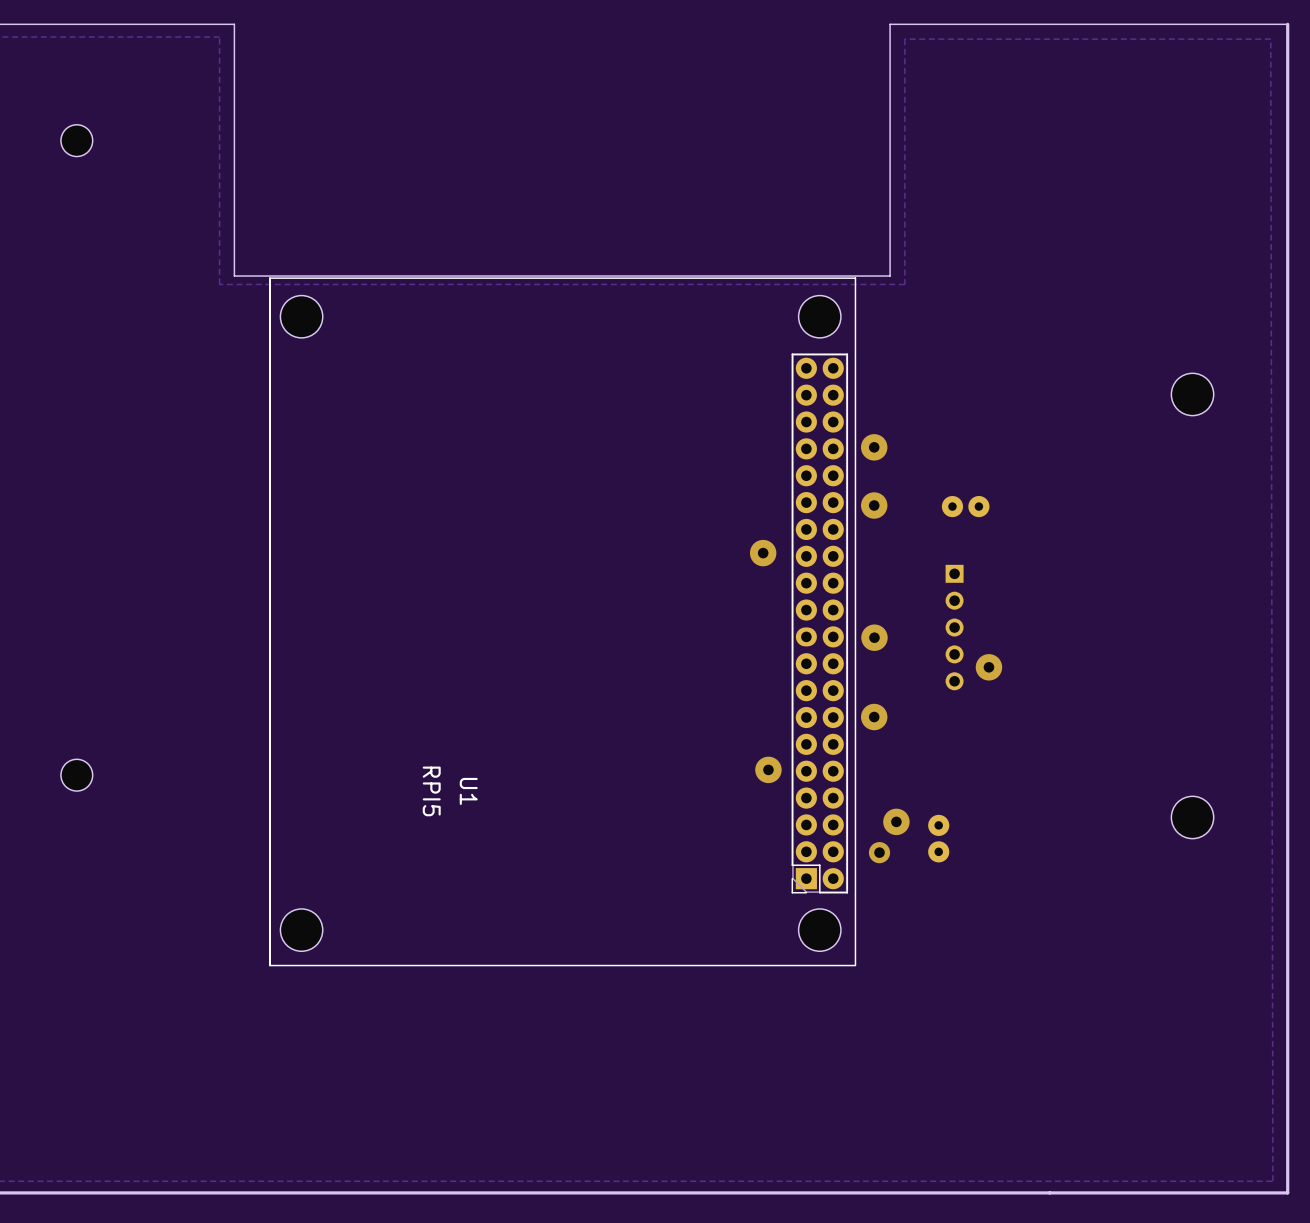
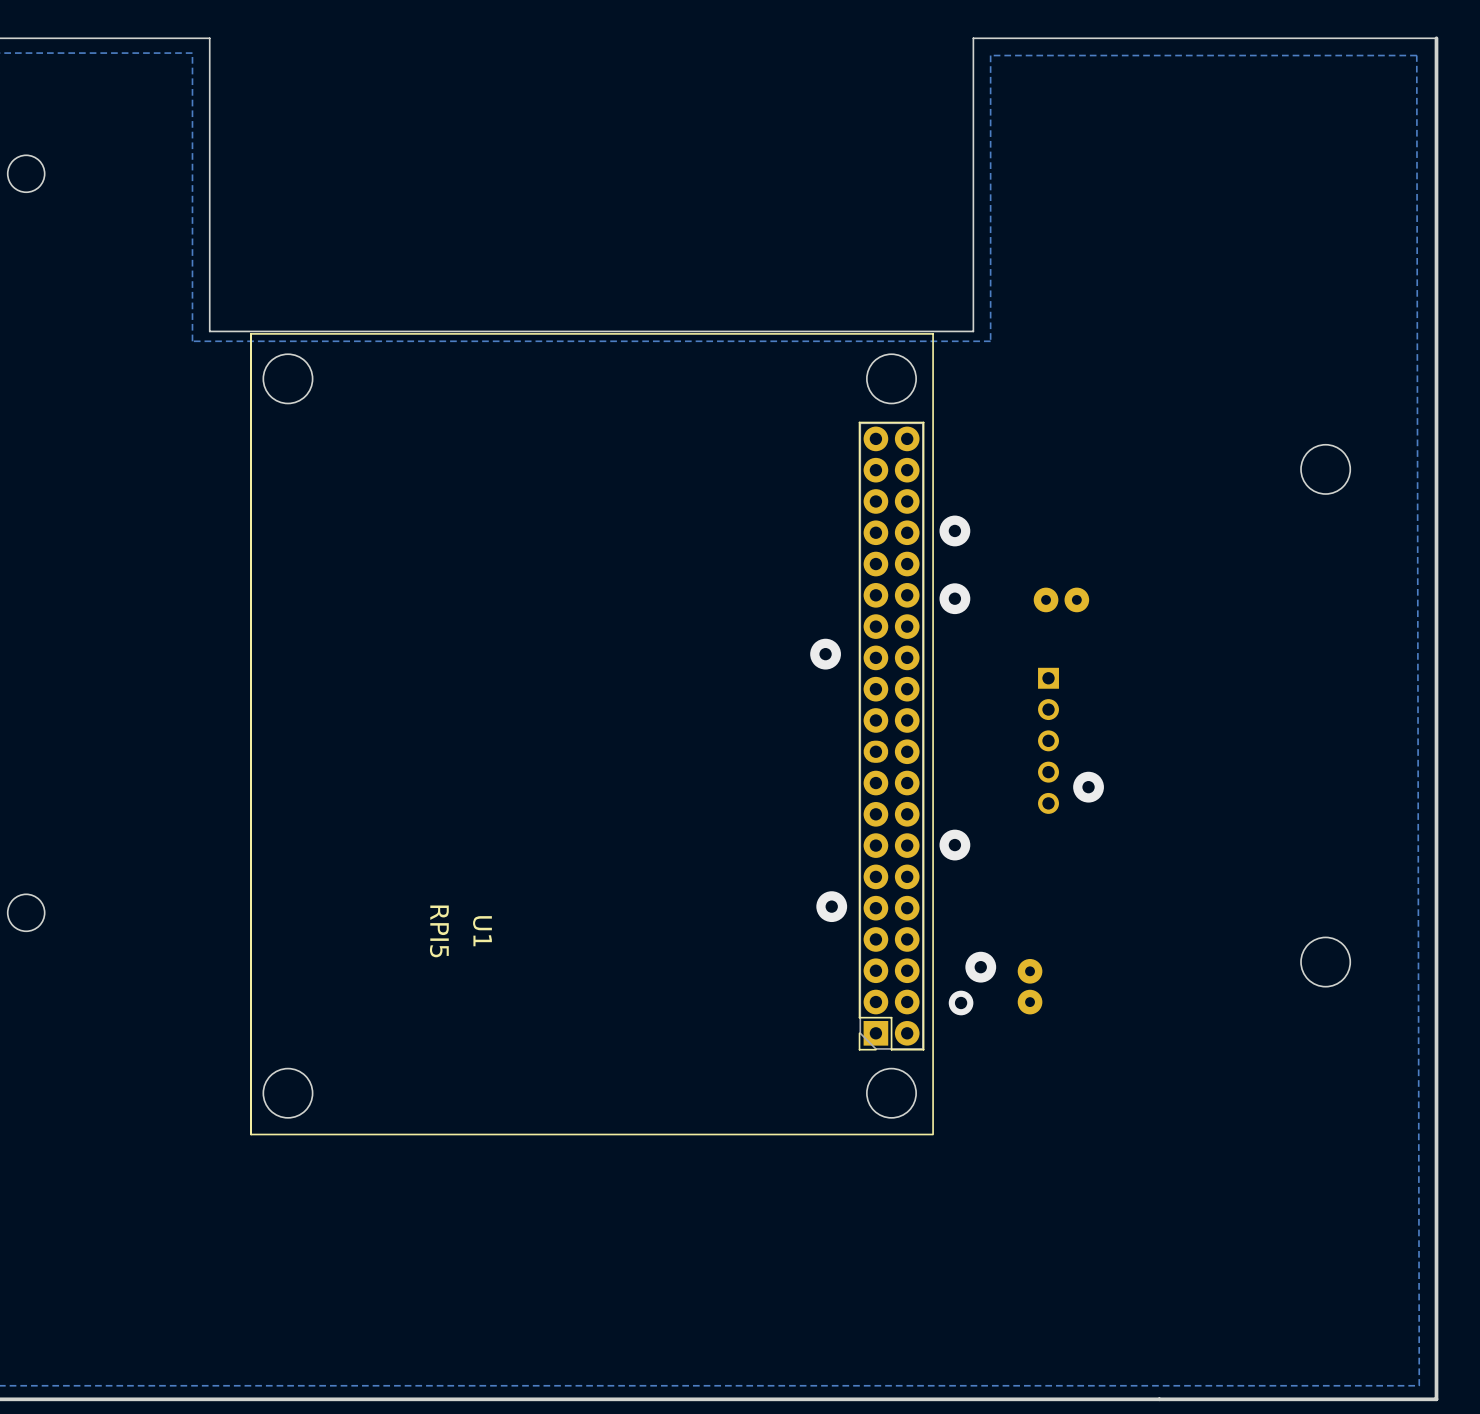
via: (874, 637) -> none

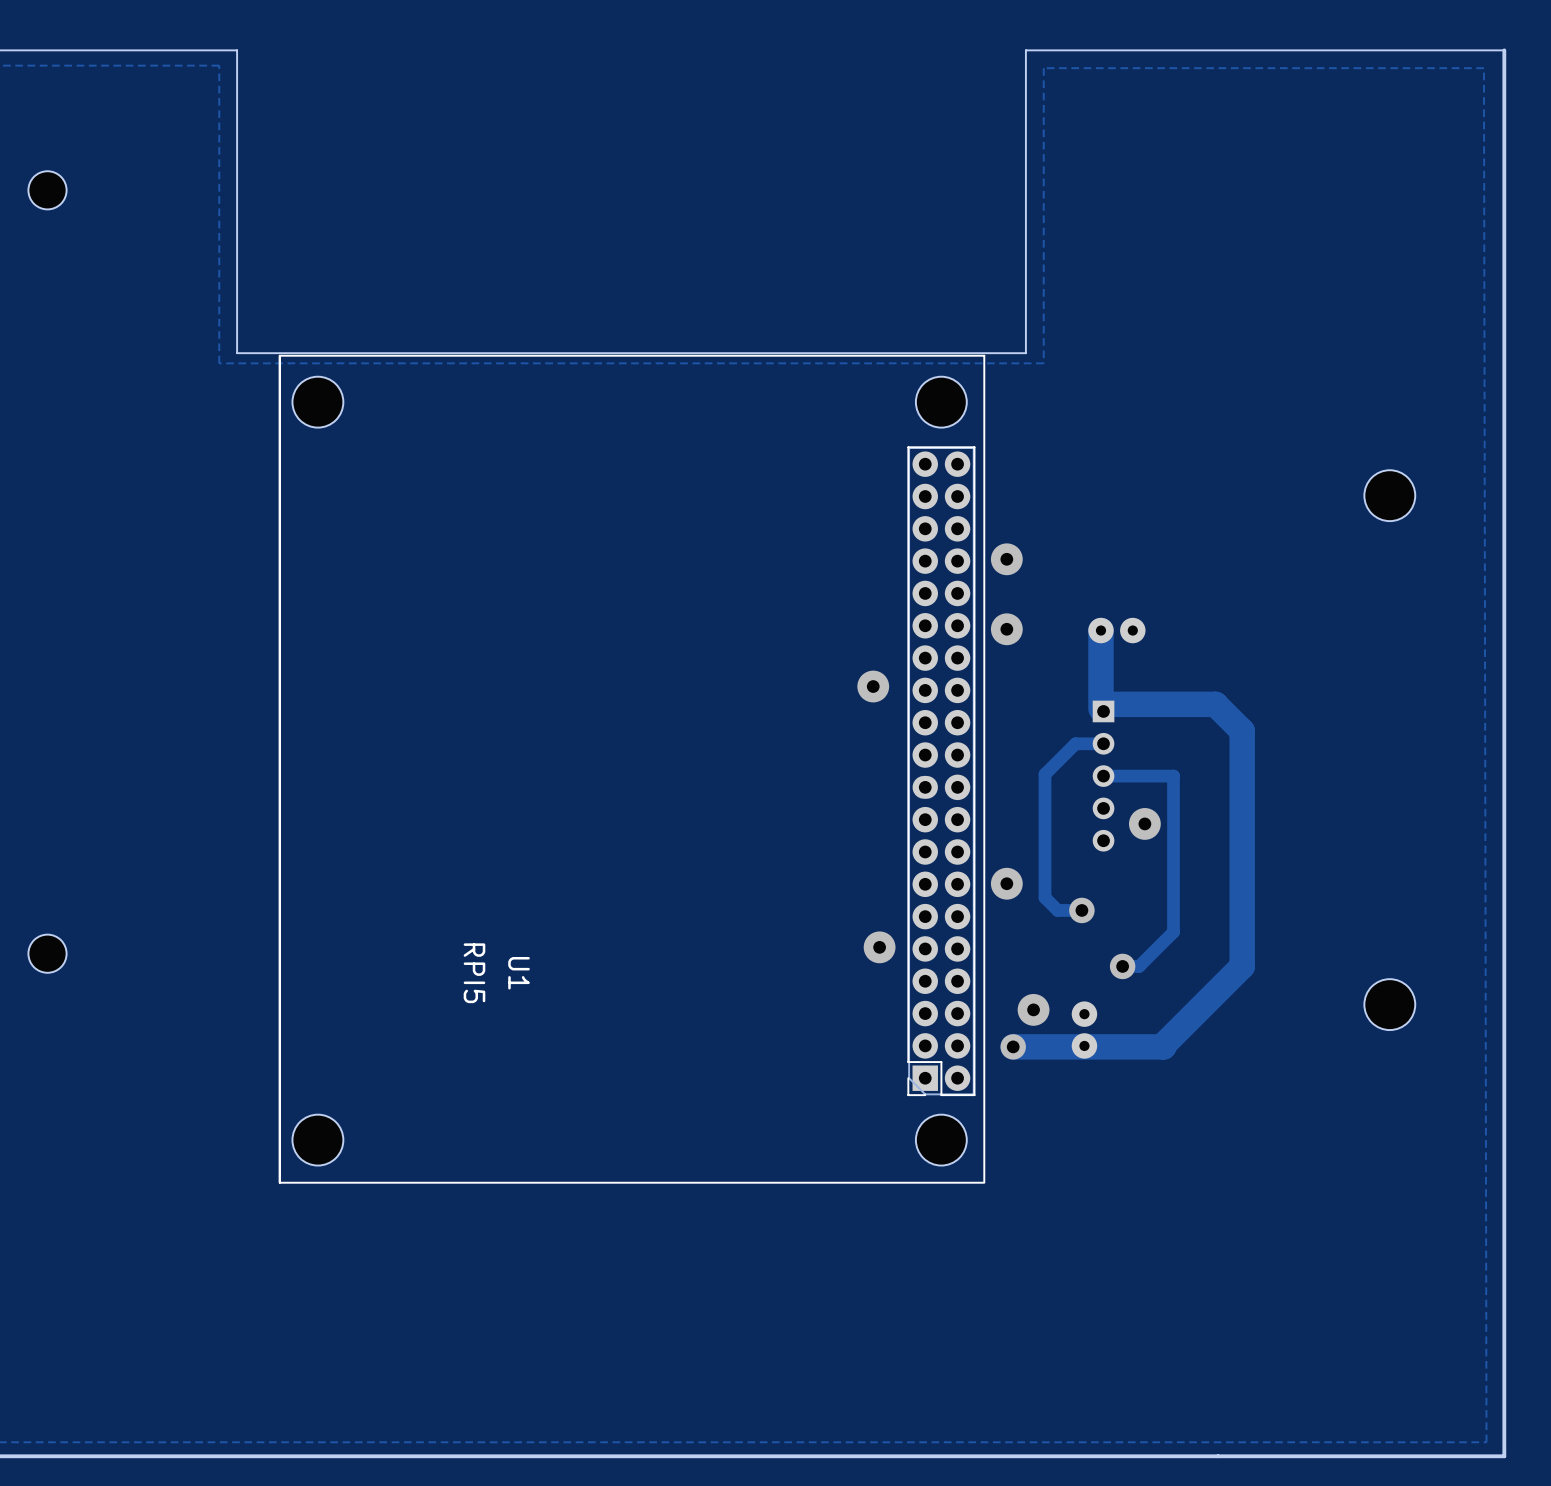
track: none -> (1100, 630) (1100, 708)
track: none -> (1110, 704) (1215, 704) (1242, 731) (1242, 966) (1163, 1046) (1013, 1046)
track: none -> (1103, 743) (1075, 743) (1045, 774) (1045, 897) (1057, 910) (1081, 910)
track: none -> (1103, 776) (1173, 776) (1173, 932) (1139, 966) (1122, 966)
via: none -> (1081, 910)
via: none -> (1122, 966)

